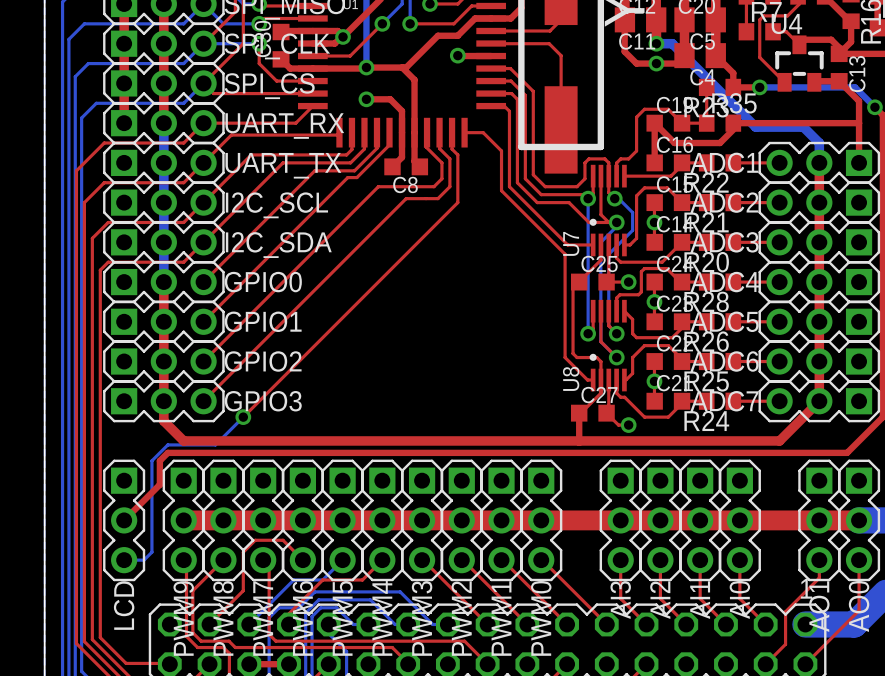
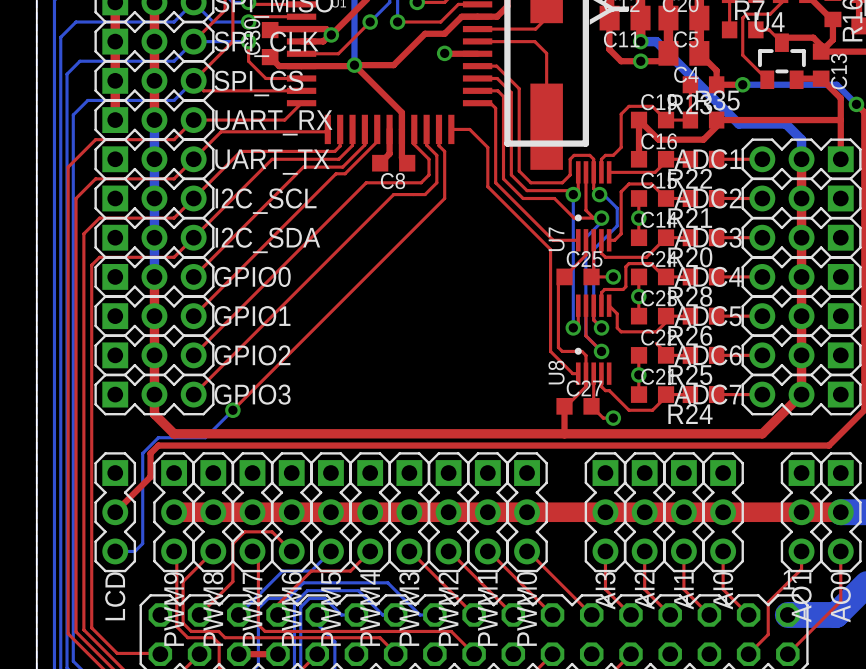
top track: (402, 67) (414, 79) (414, 115) -> (354, 65) (401, 112)
top track: (366, 99) (390, 99) (402, 111) (402, 132) -> none
via: (366, 99) -> none
top track: (672, 349) (668, 345) (644, 345) (632, 357) (632, 373) (624, 379) -> none

